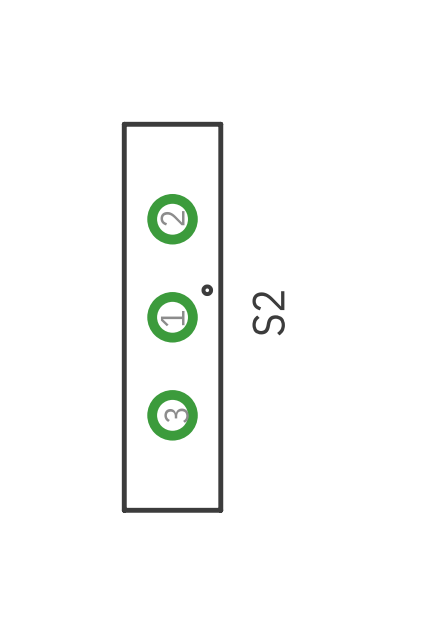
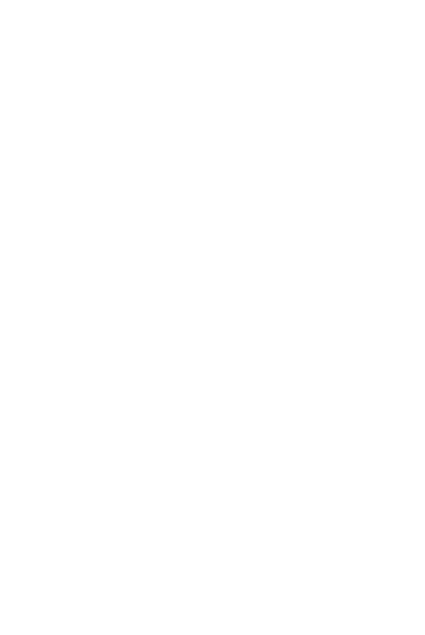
S2: (172, 317) -> none

